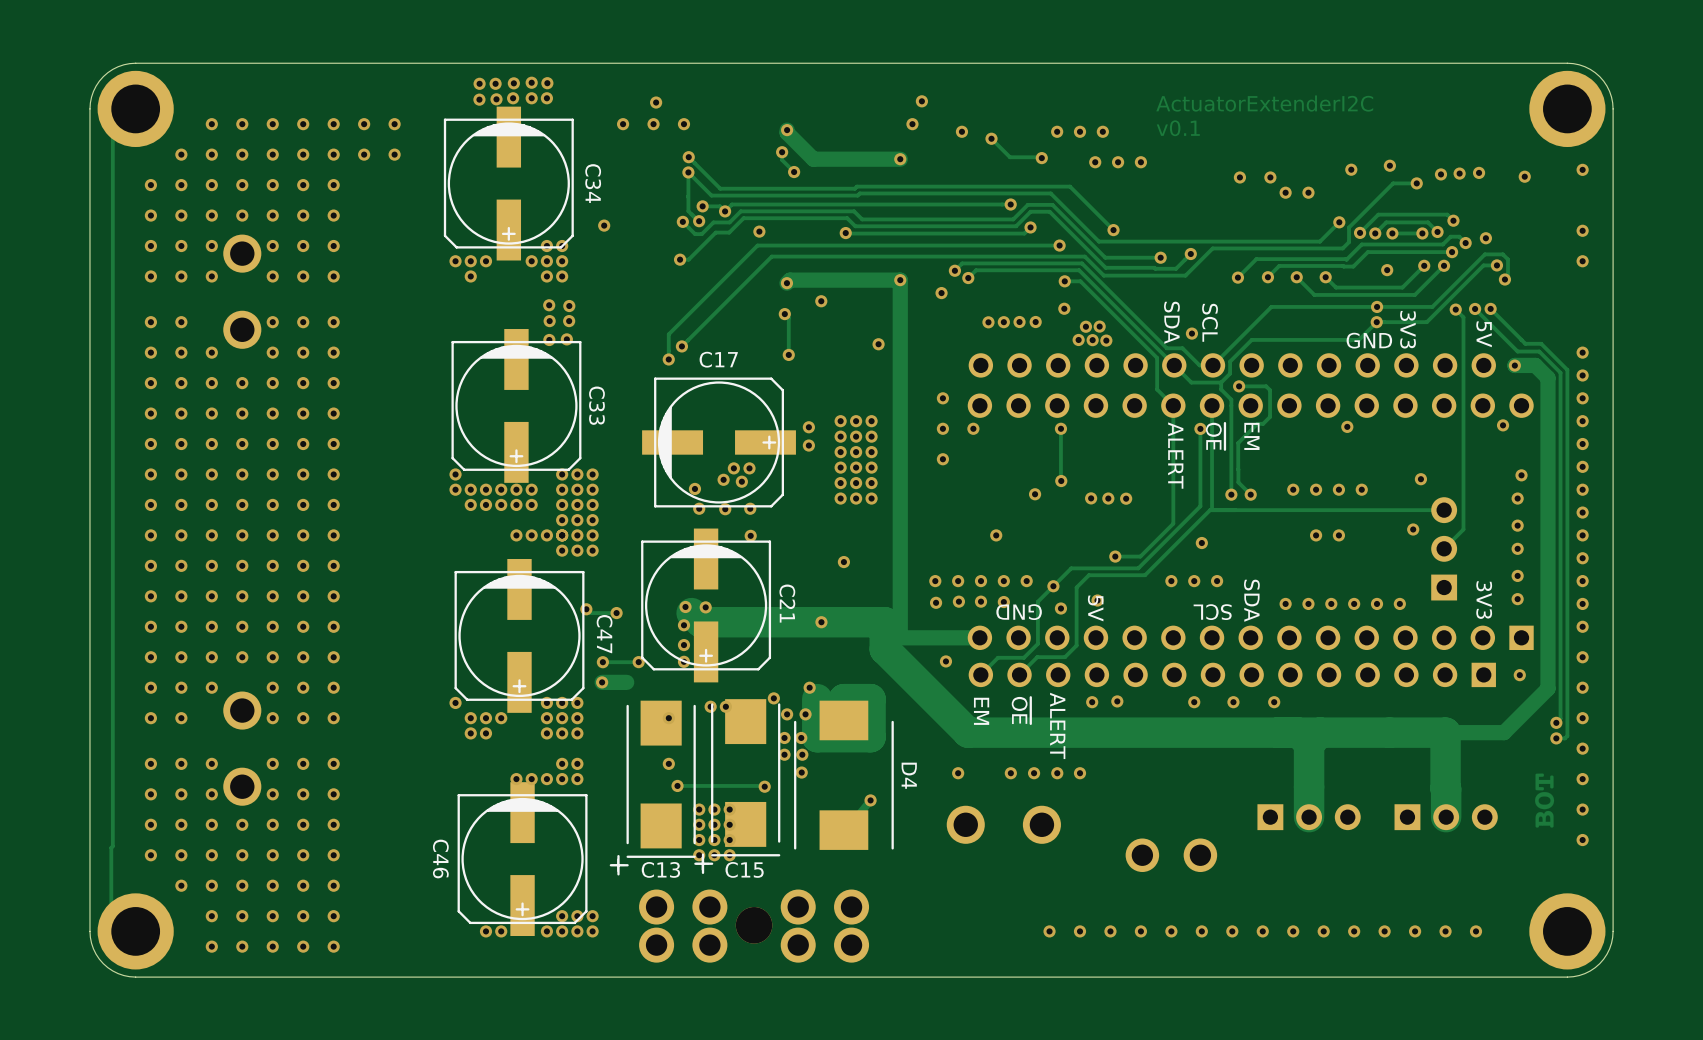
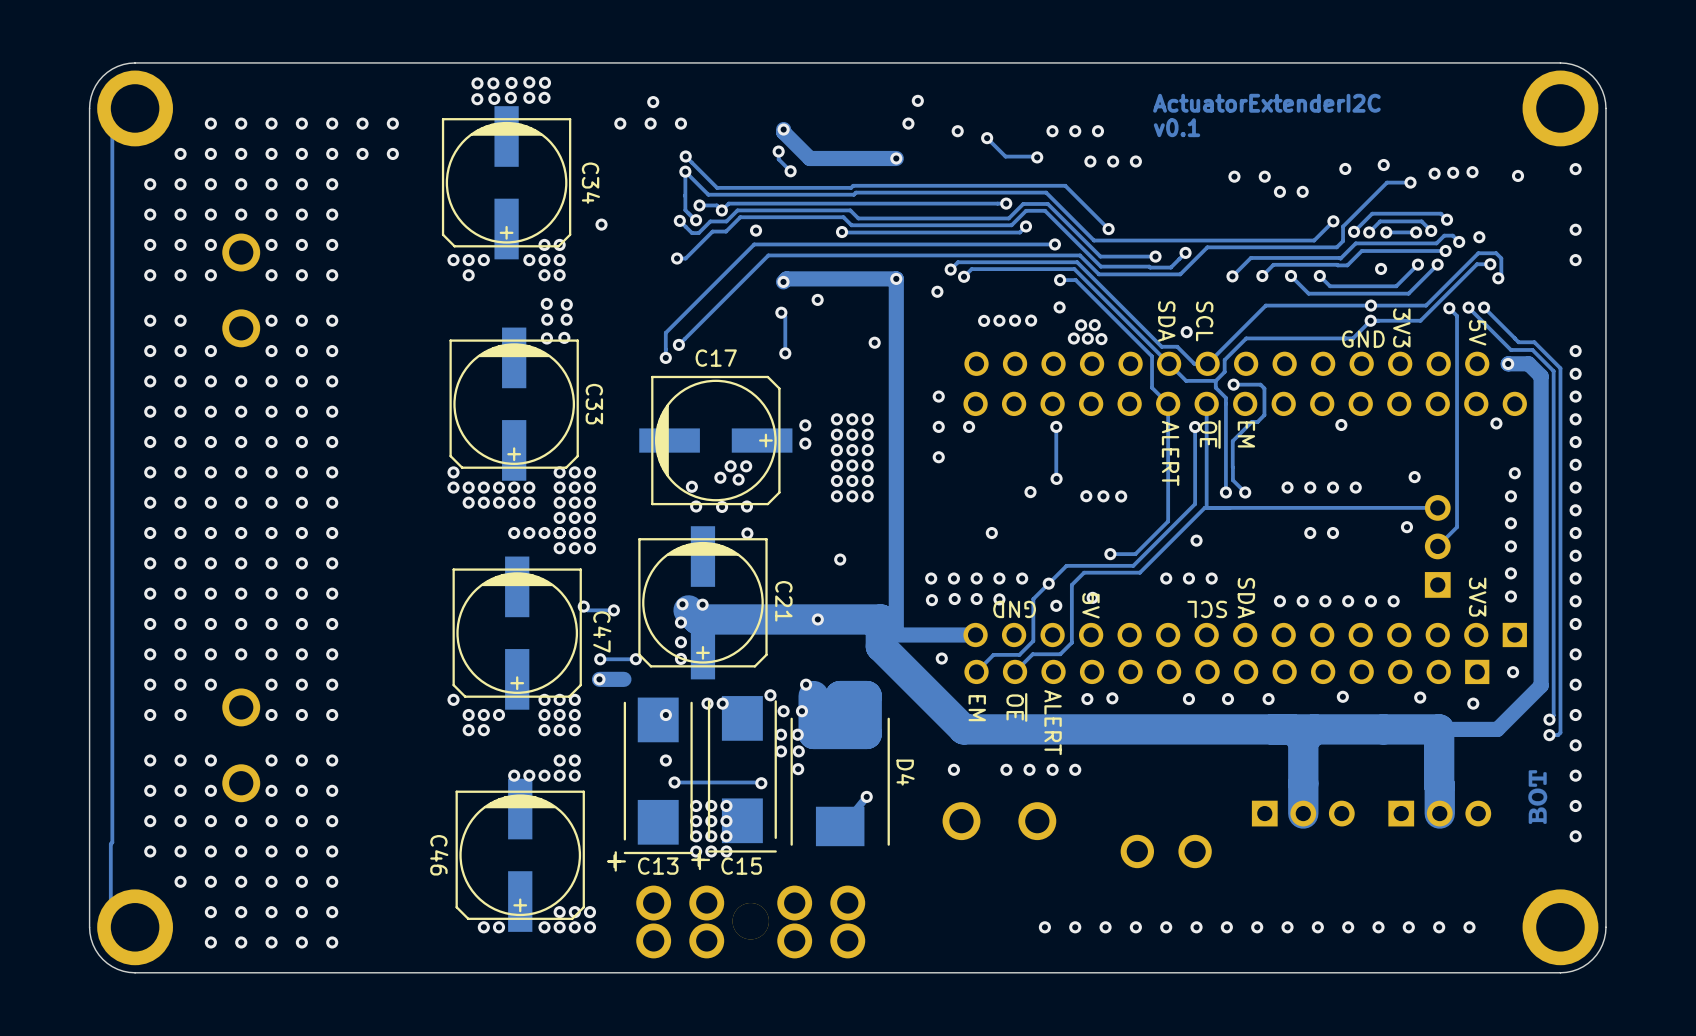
via: none -> (1342, 696)
via: none -> (1420, 697)
via: none -> (1473, 703)

